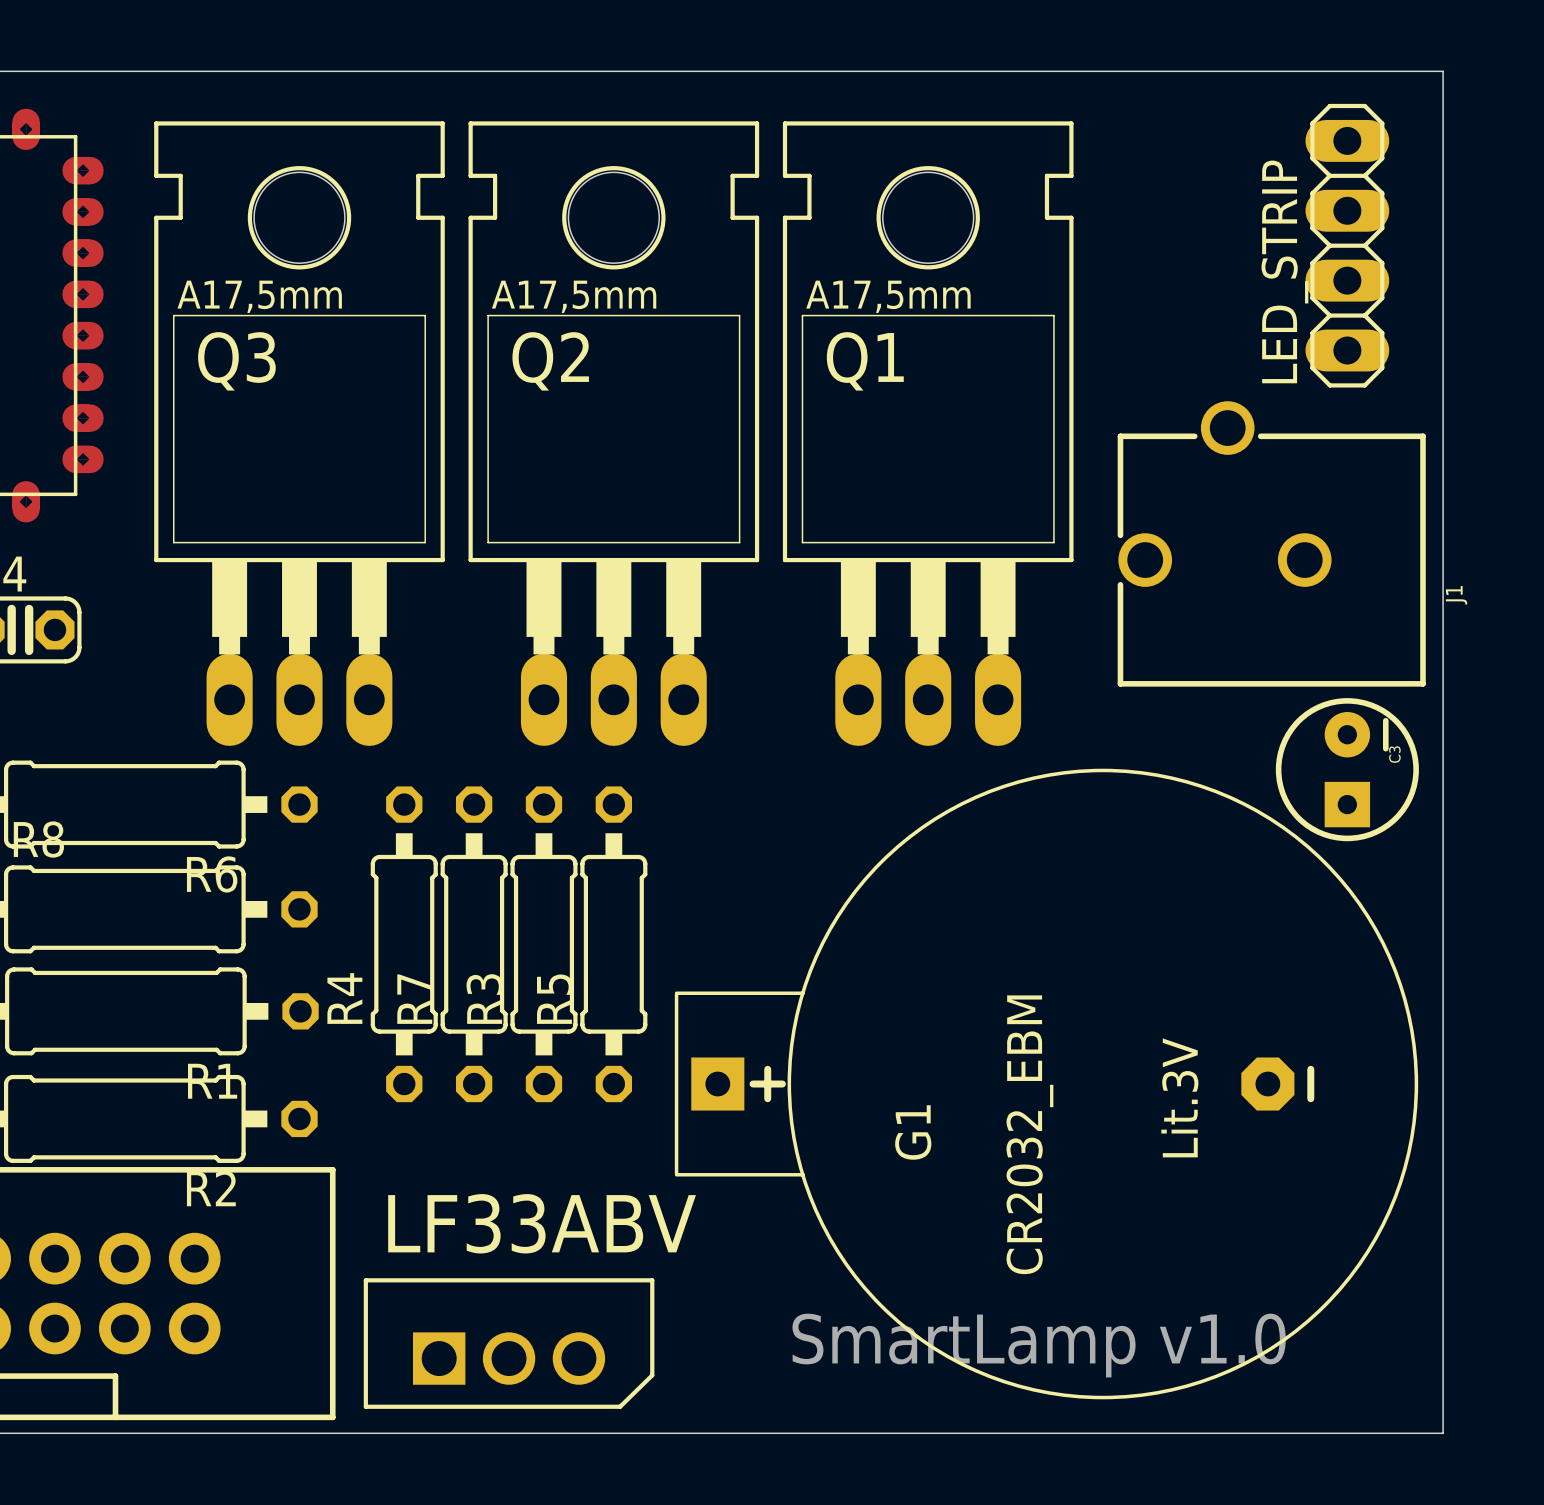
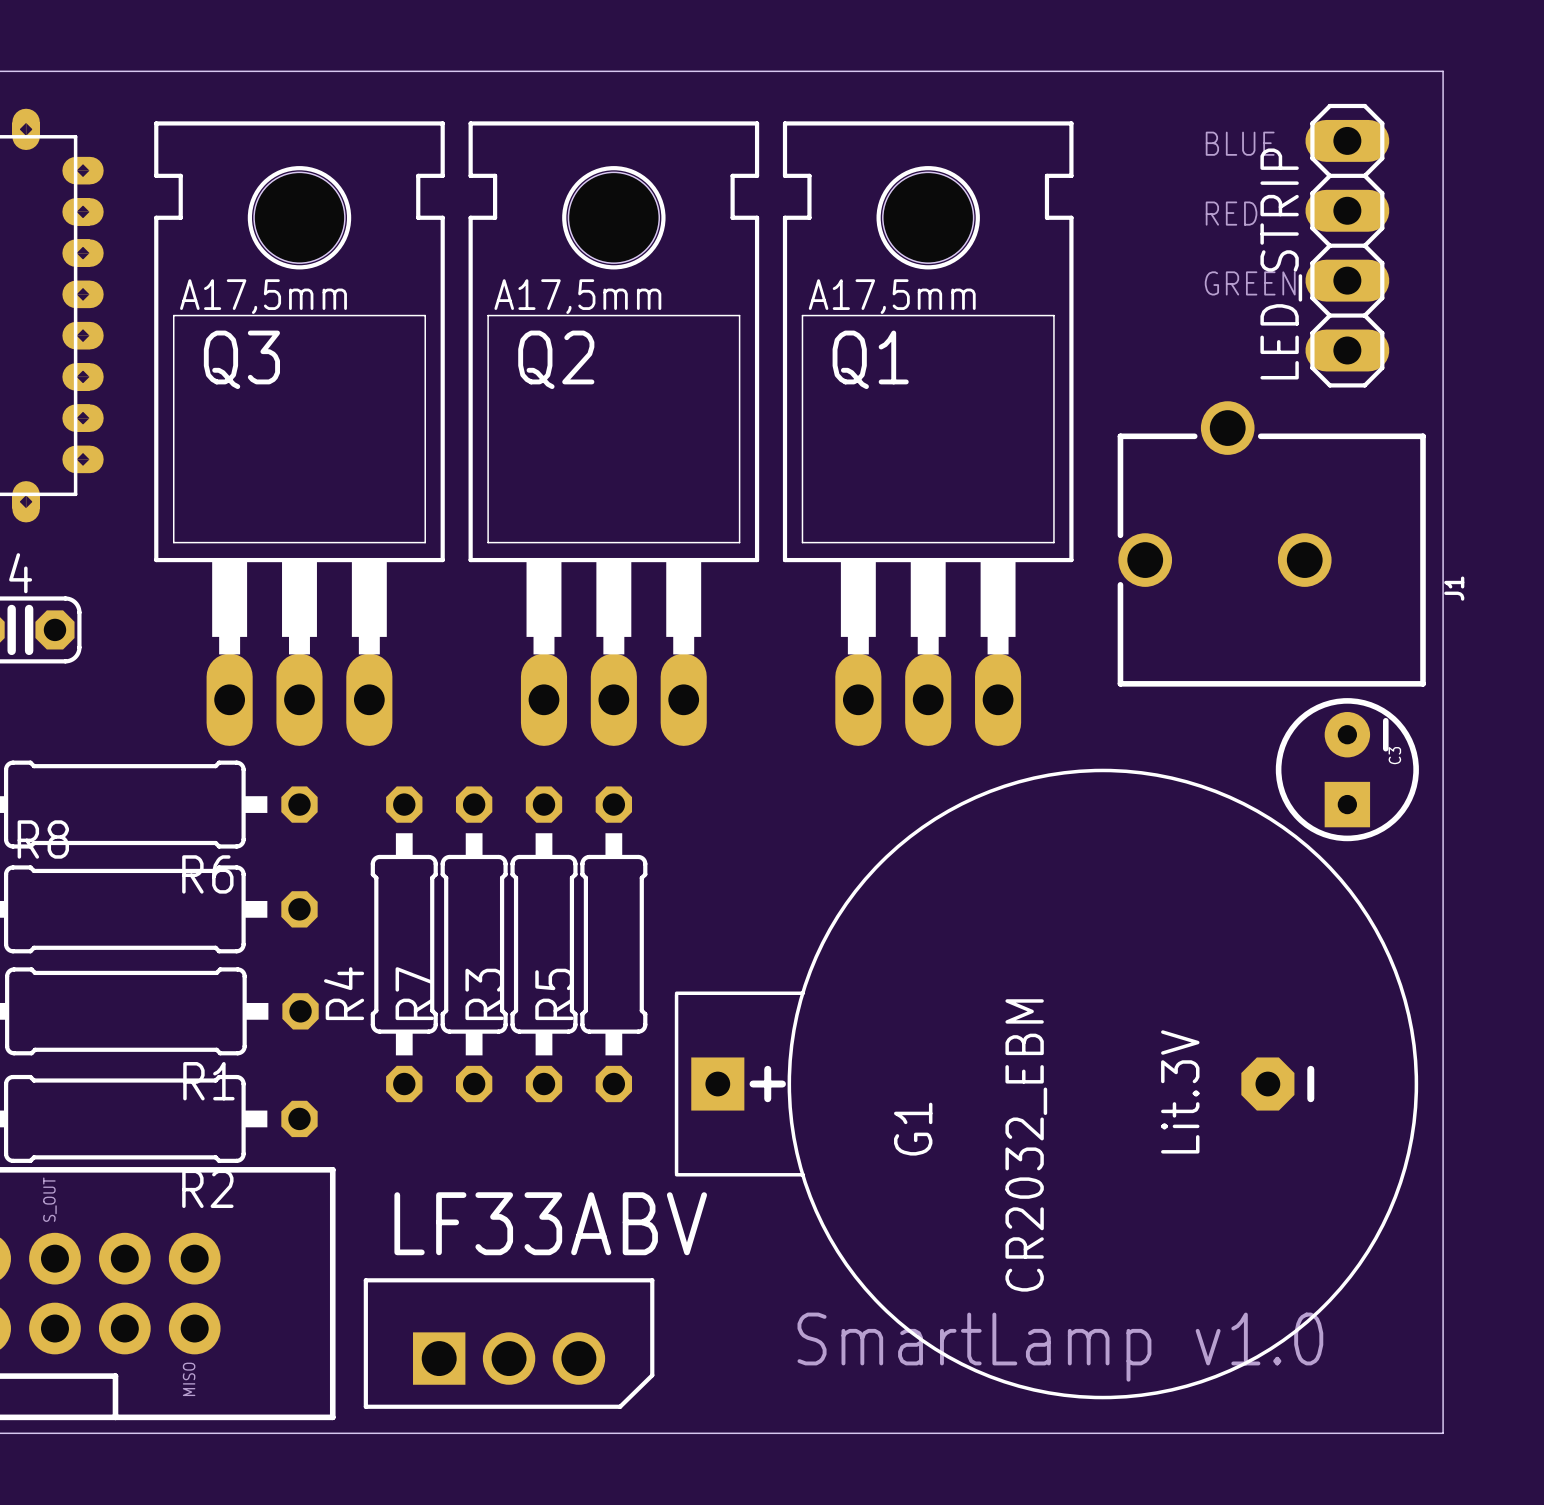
text: none -> BLUE (1240, 143)
text: none -> RED (1231, 213)
text: none -> GREEN (1250, 283)
text: none -> S_OUT (49, 1199)
text: none -> MISO (189, 1379)

